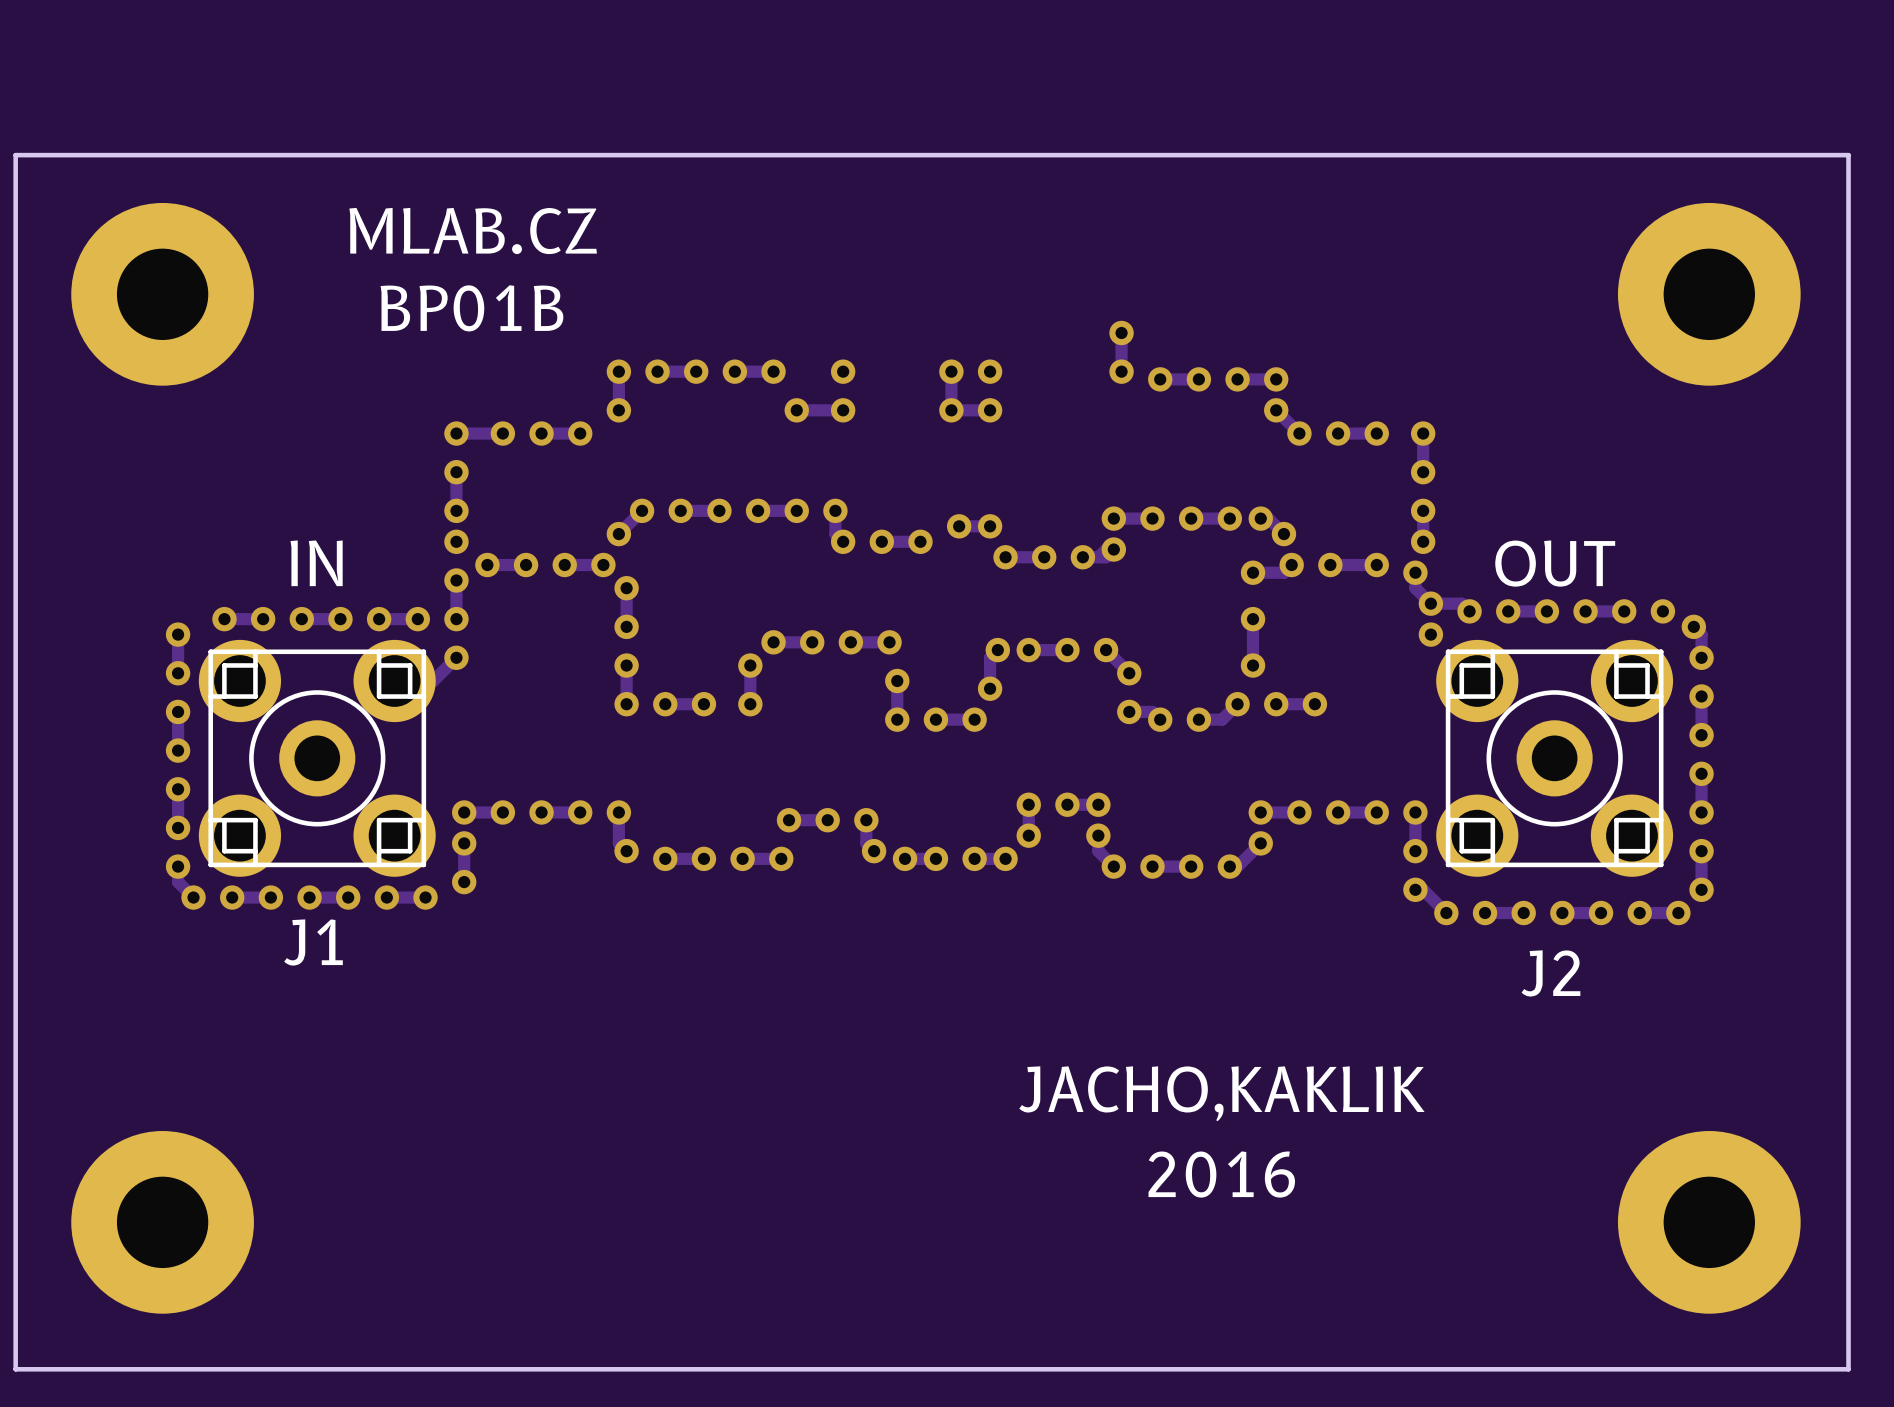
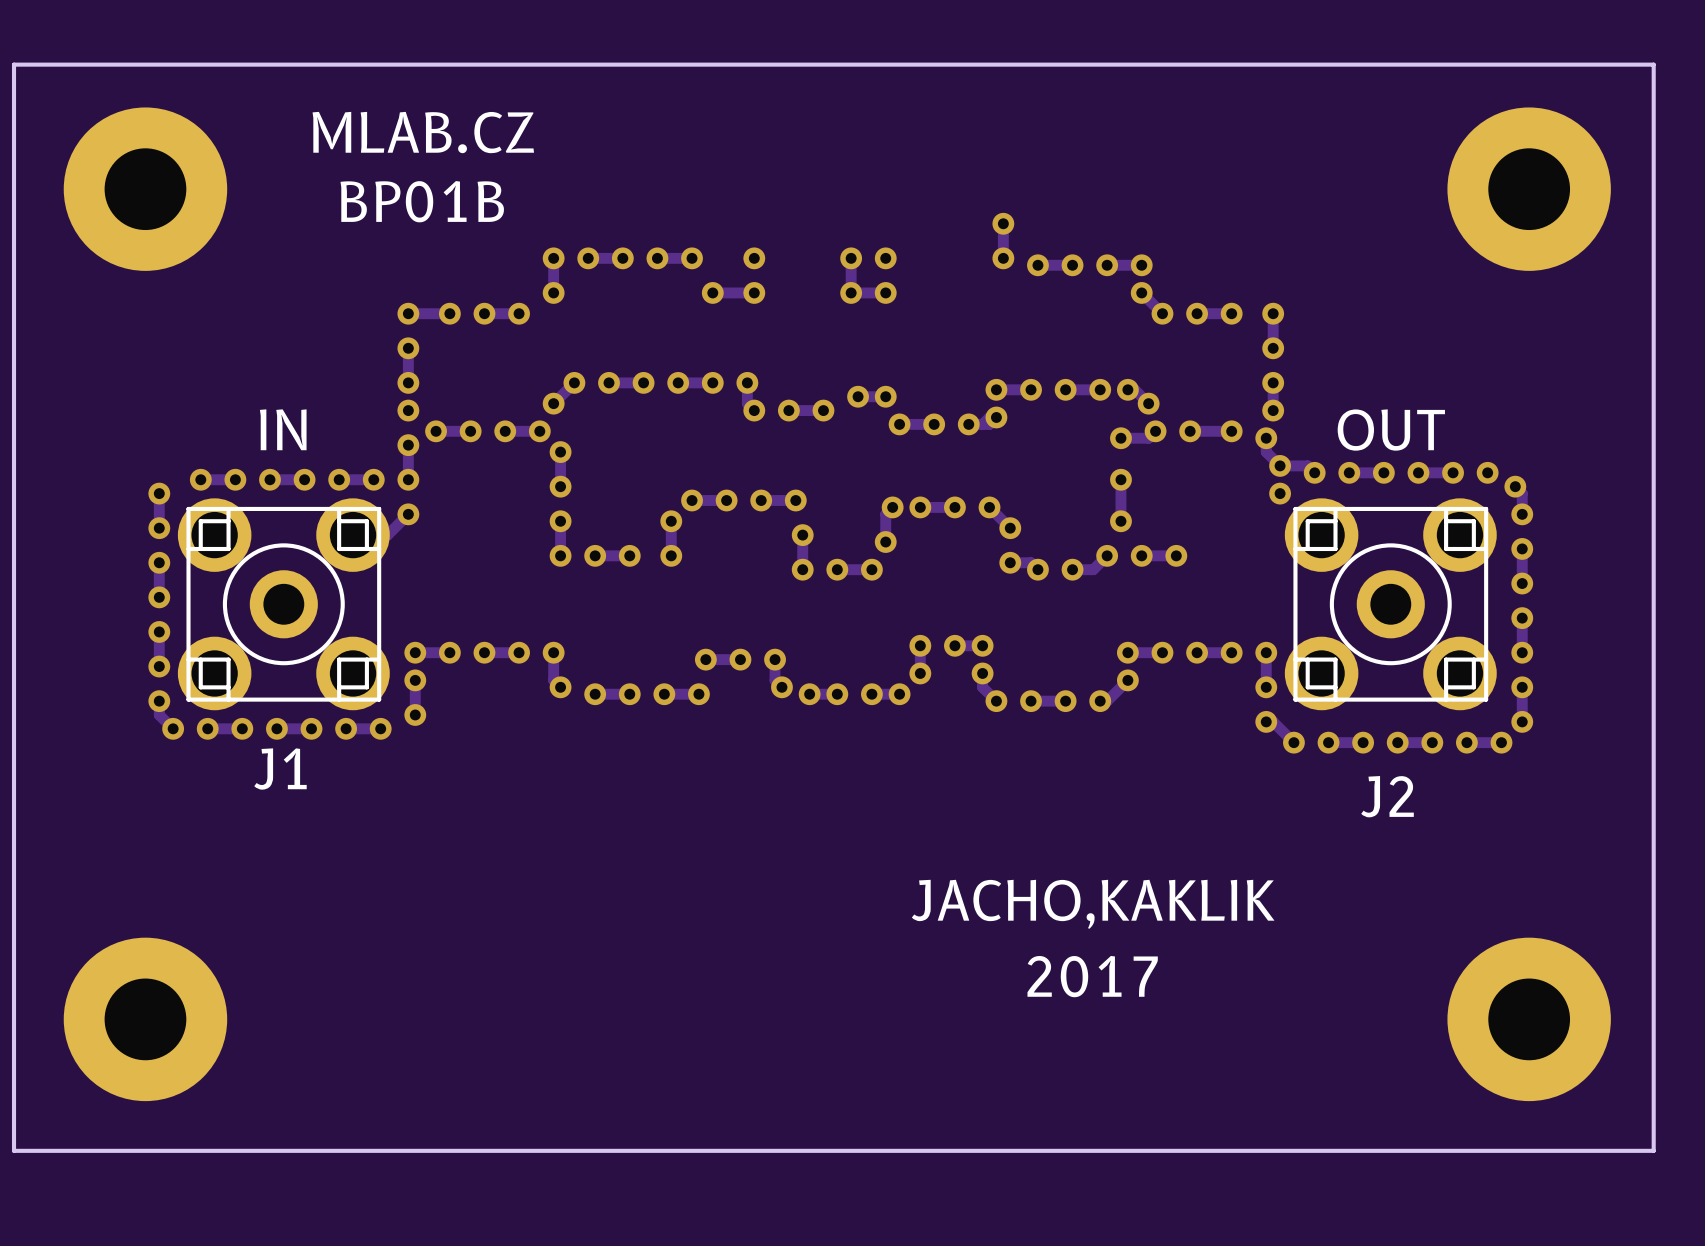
text: 2016 (1221, 1174) -> 2017 (1092, 976)

